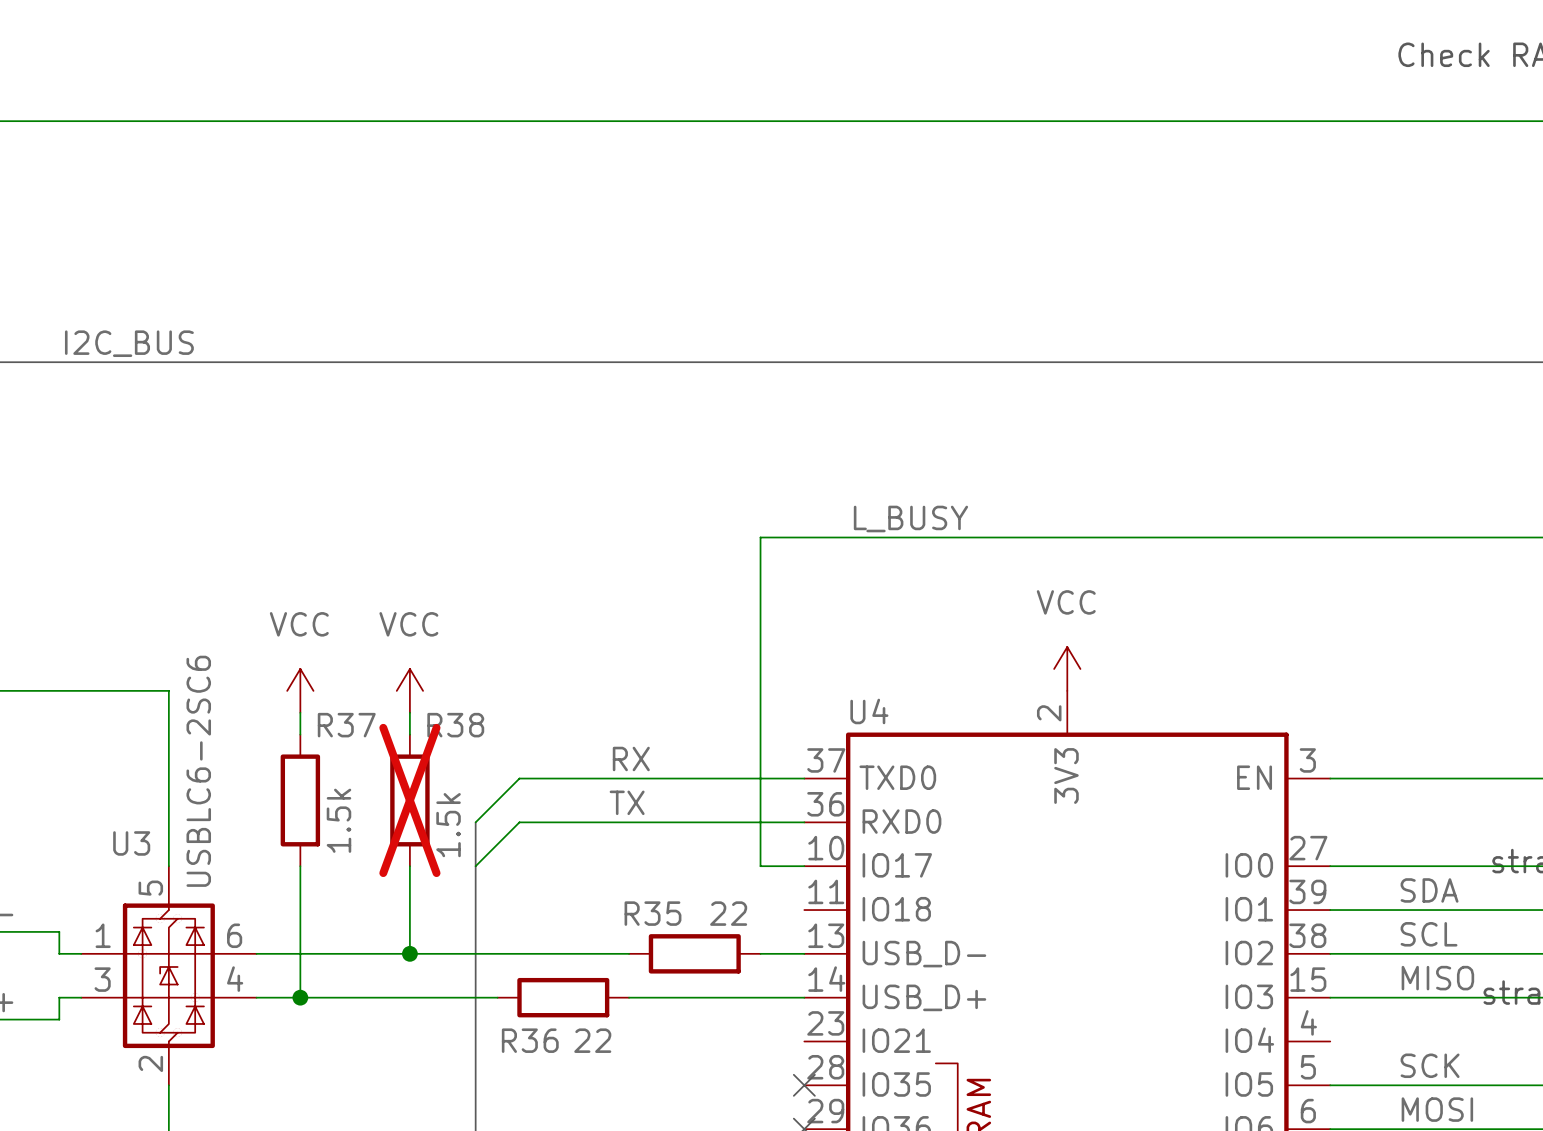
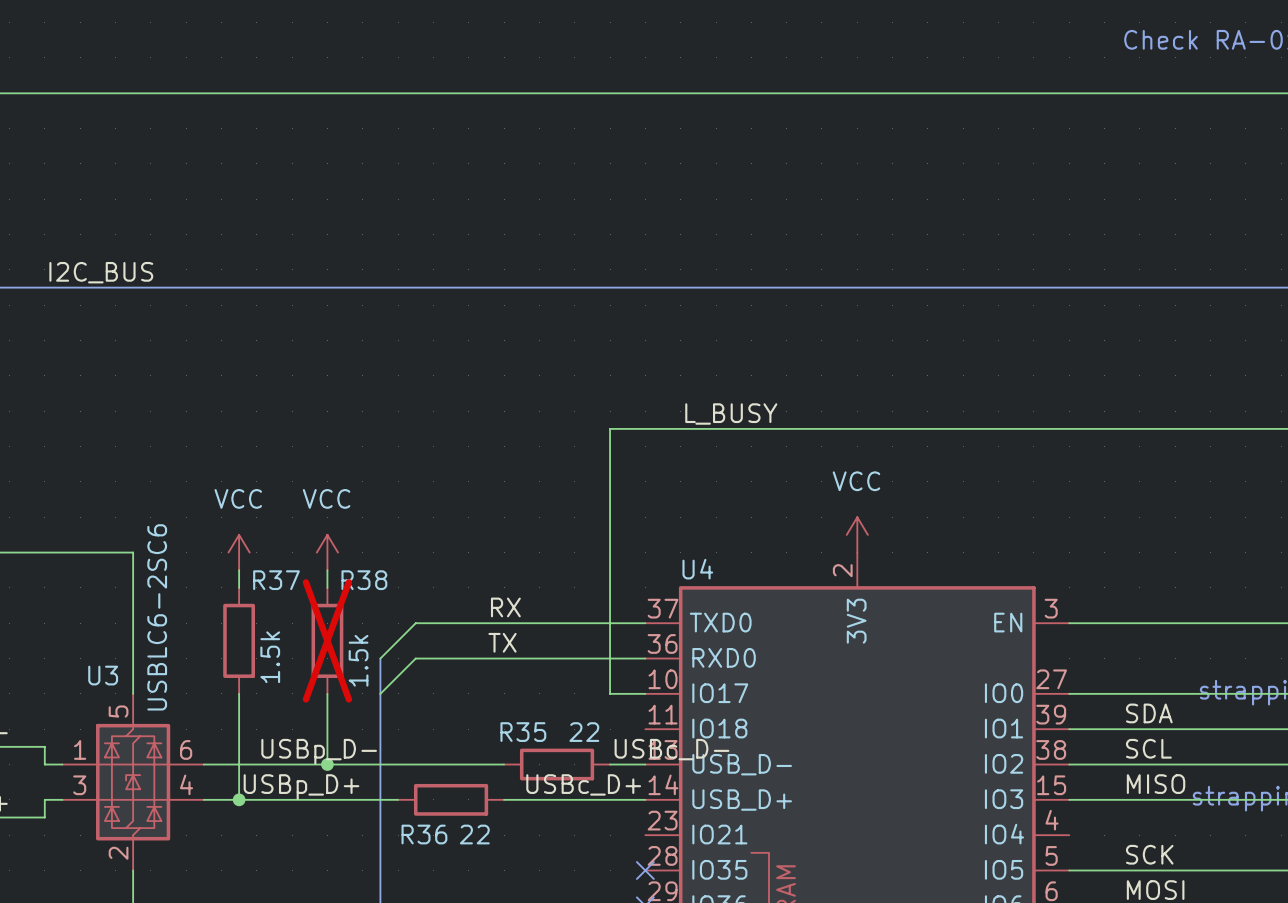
label: none -> USBc_D- (671, 749)
label: none -> USBp_D- (319, 751)
label: none -> USBc_D+ (583, 784)
label: none -> USBp_D+ (301, 787)

